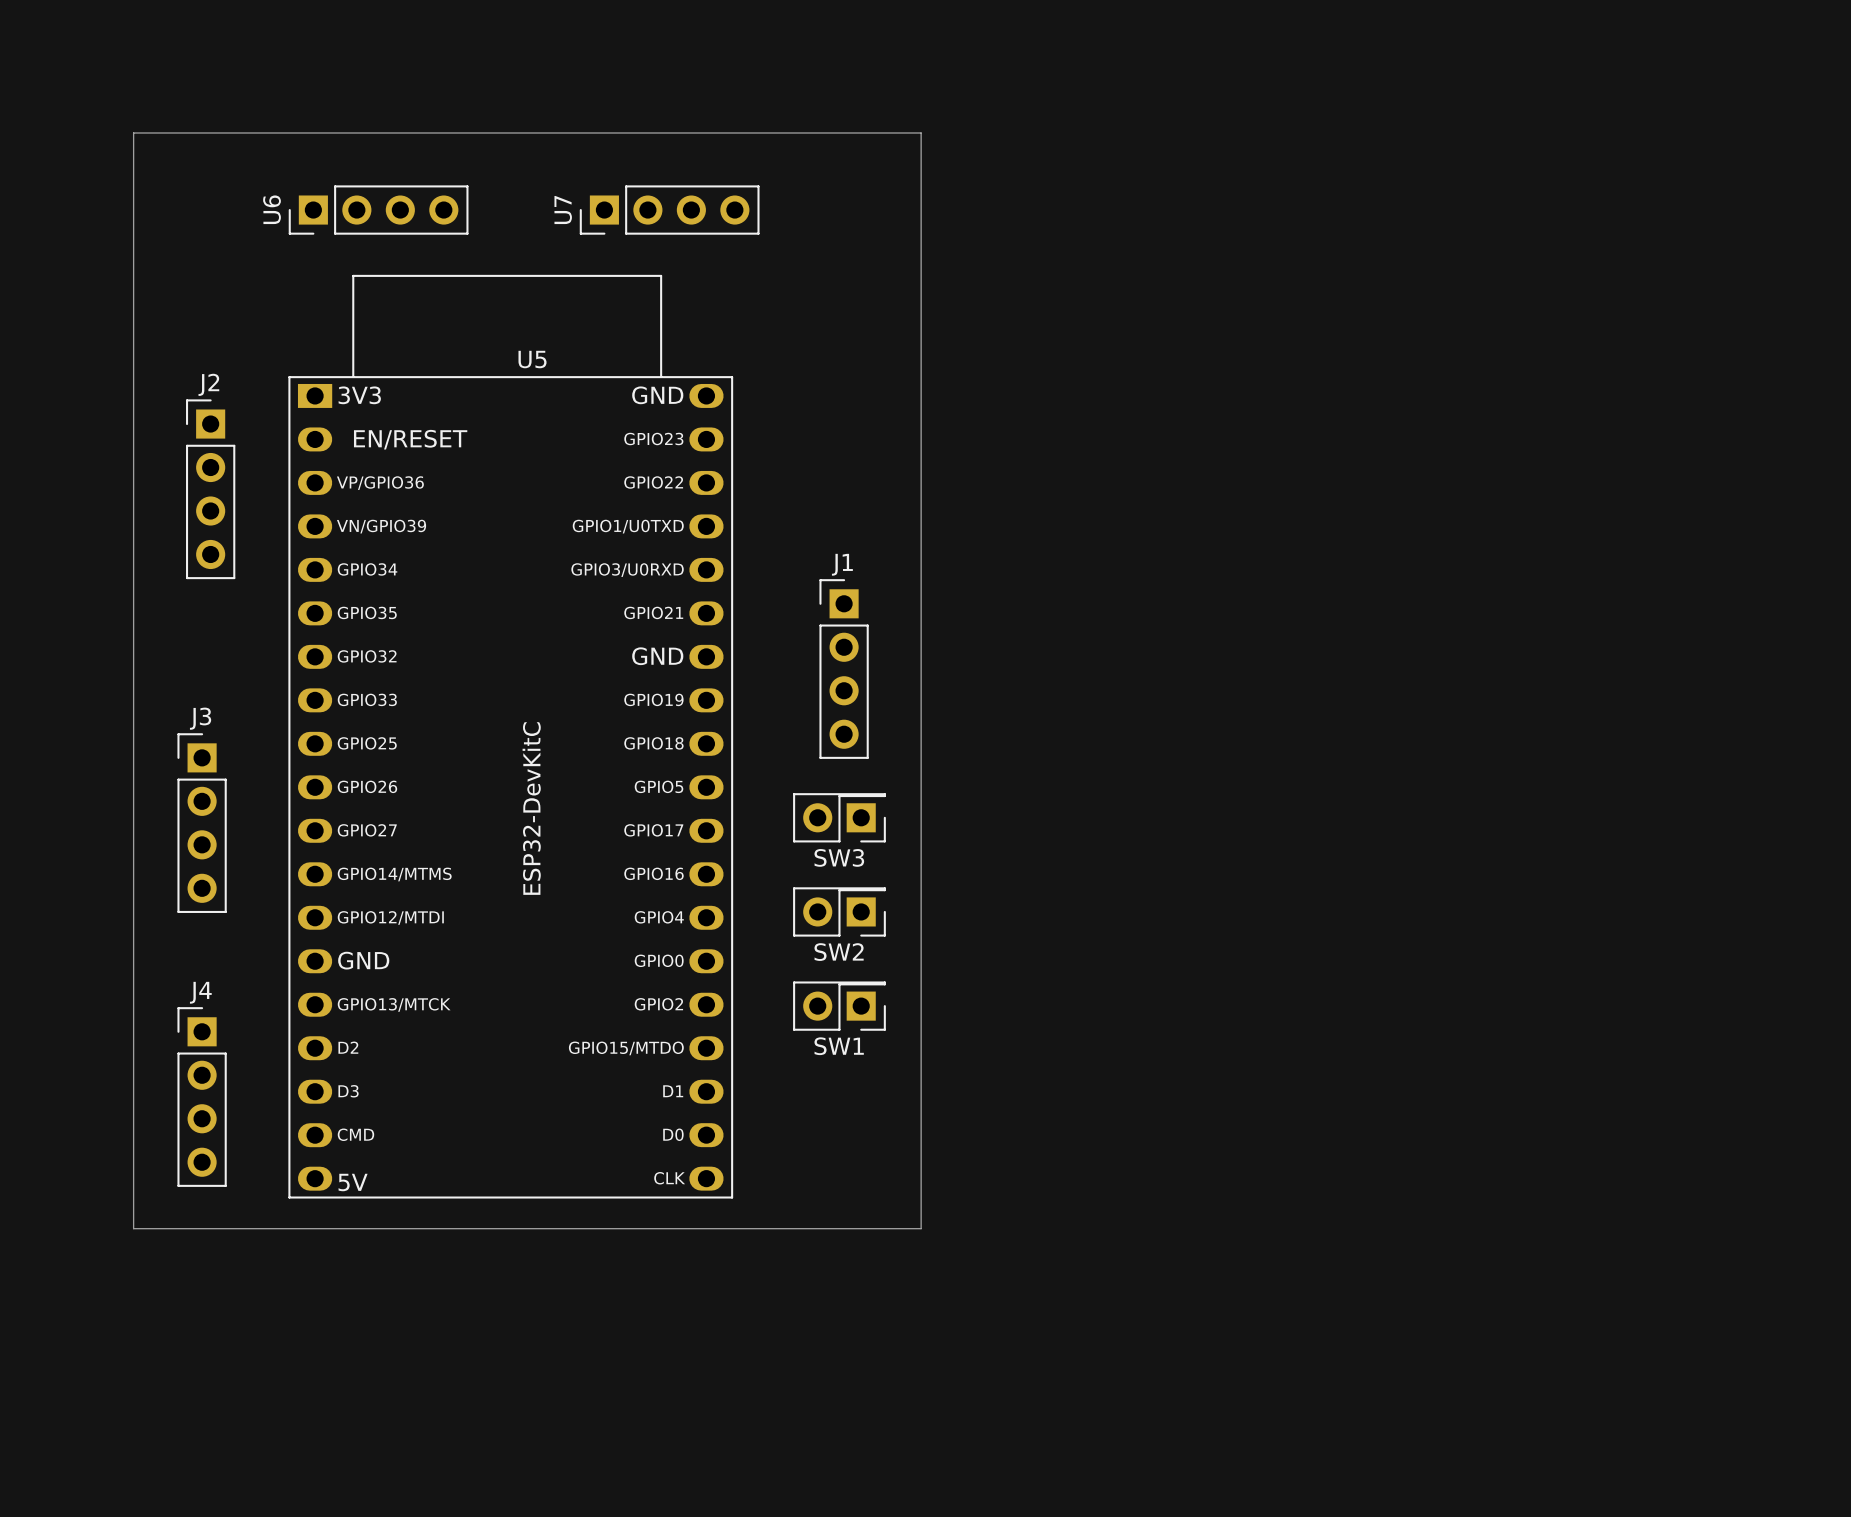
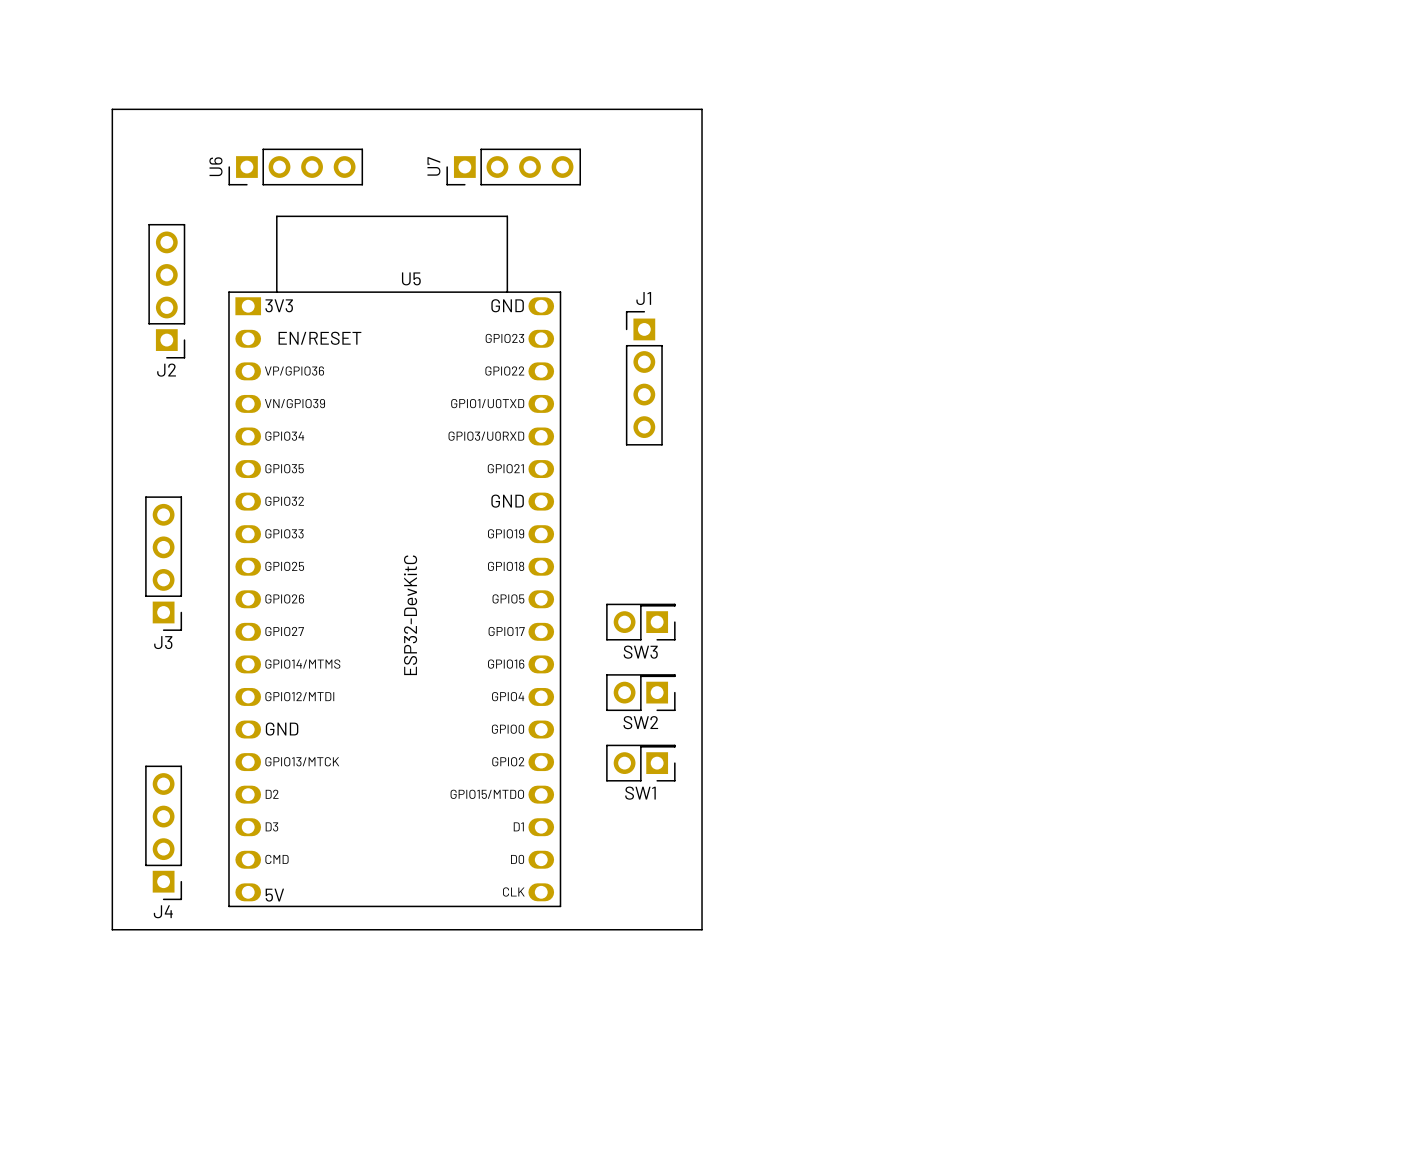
J2 rotation: 0° (210, 489) -> 180° (166, 291)
J2 position: (210, 489) -> (166, 291)
J1 position: (844, 669) -> (644, 378)
J3 rotation: 0° (202, 823) -> 180° (163, 563)
J4 rotation: 0° (202, 1097) -> 180° (163, 832)

